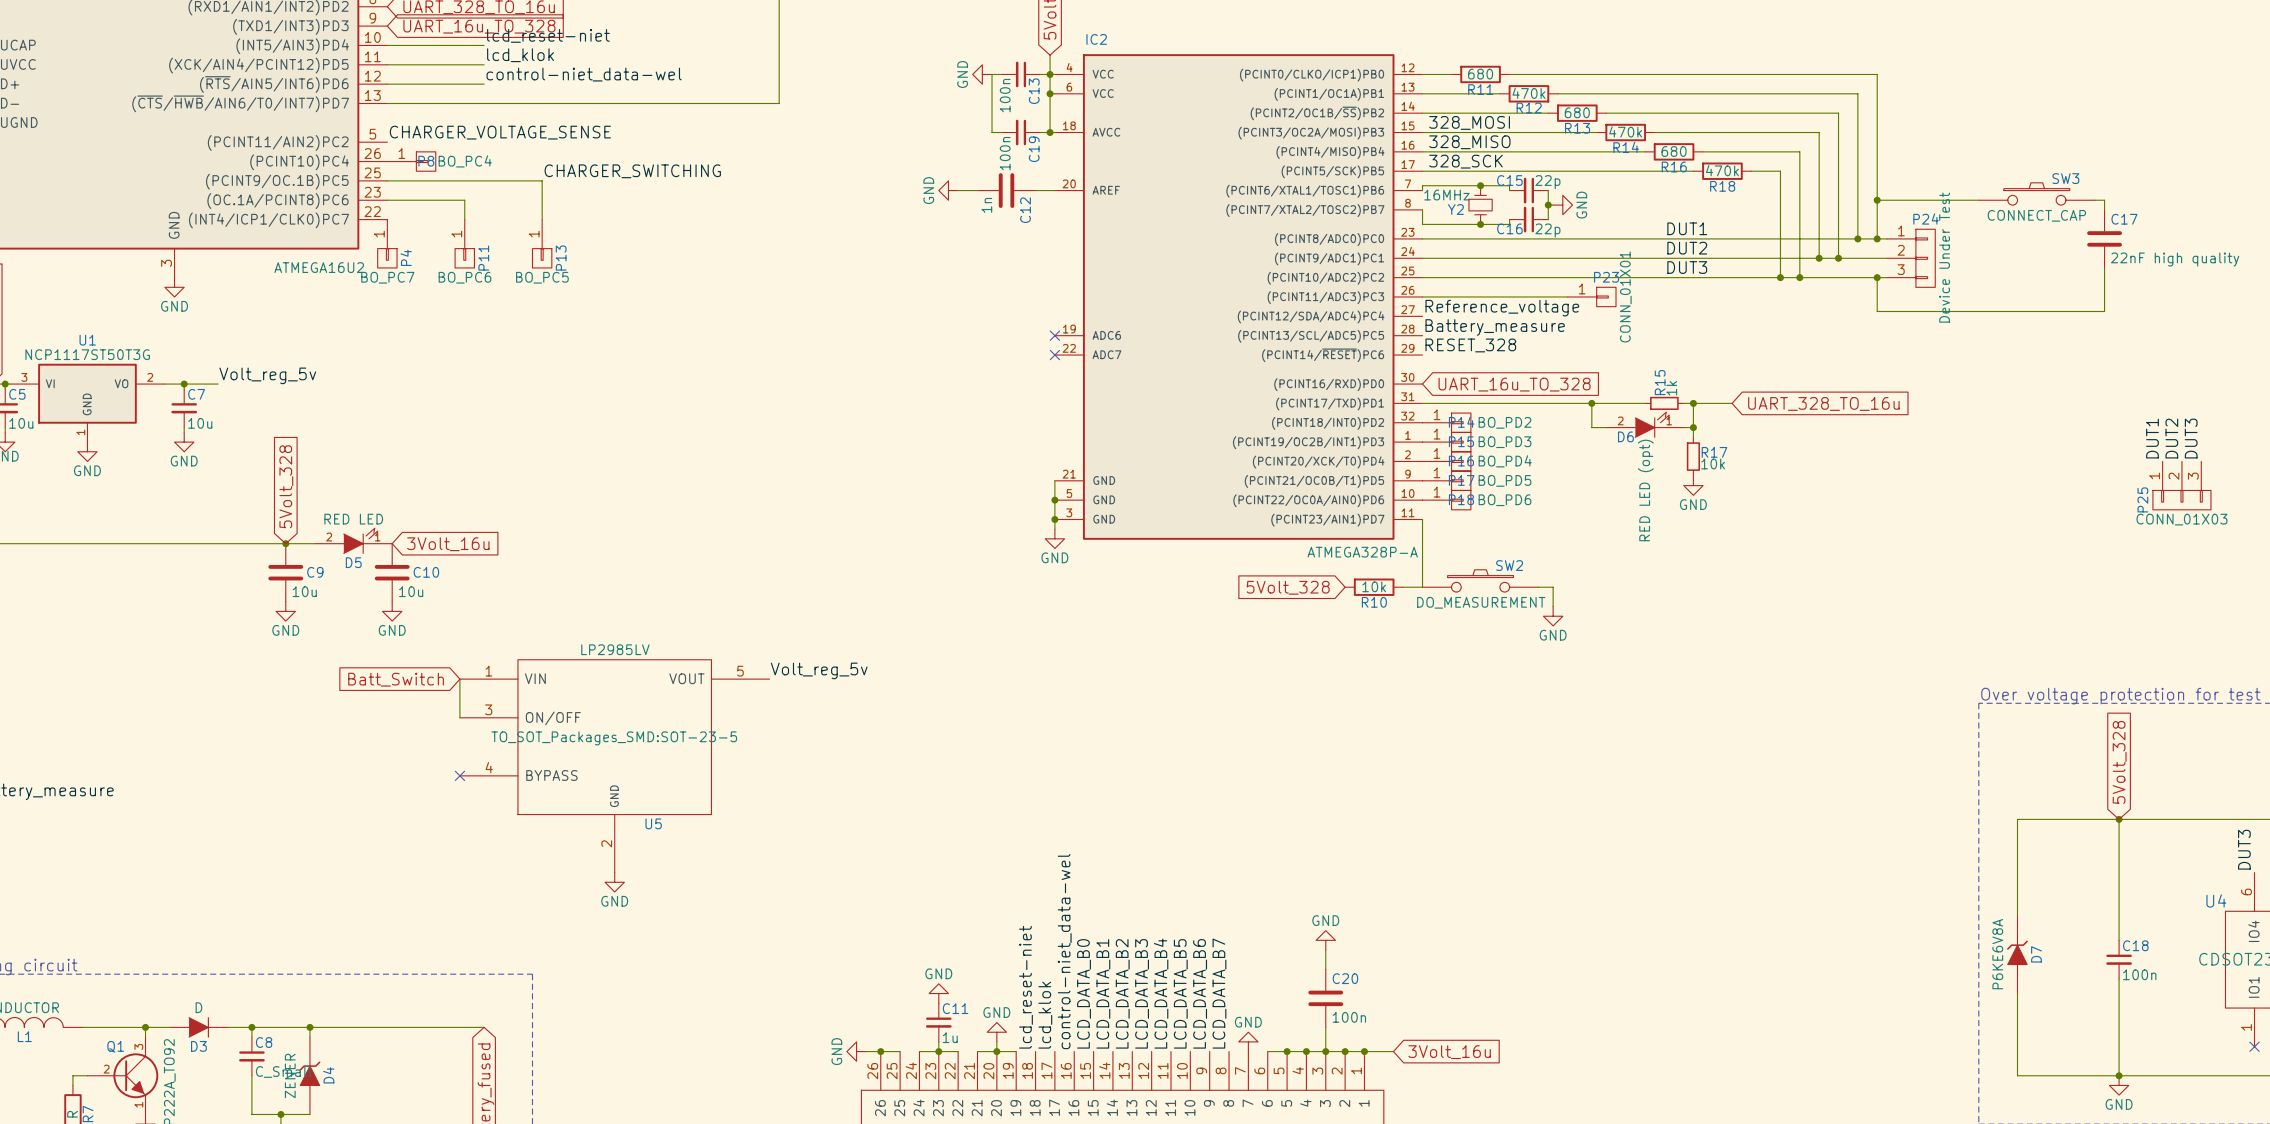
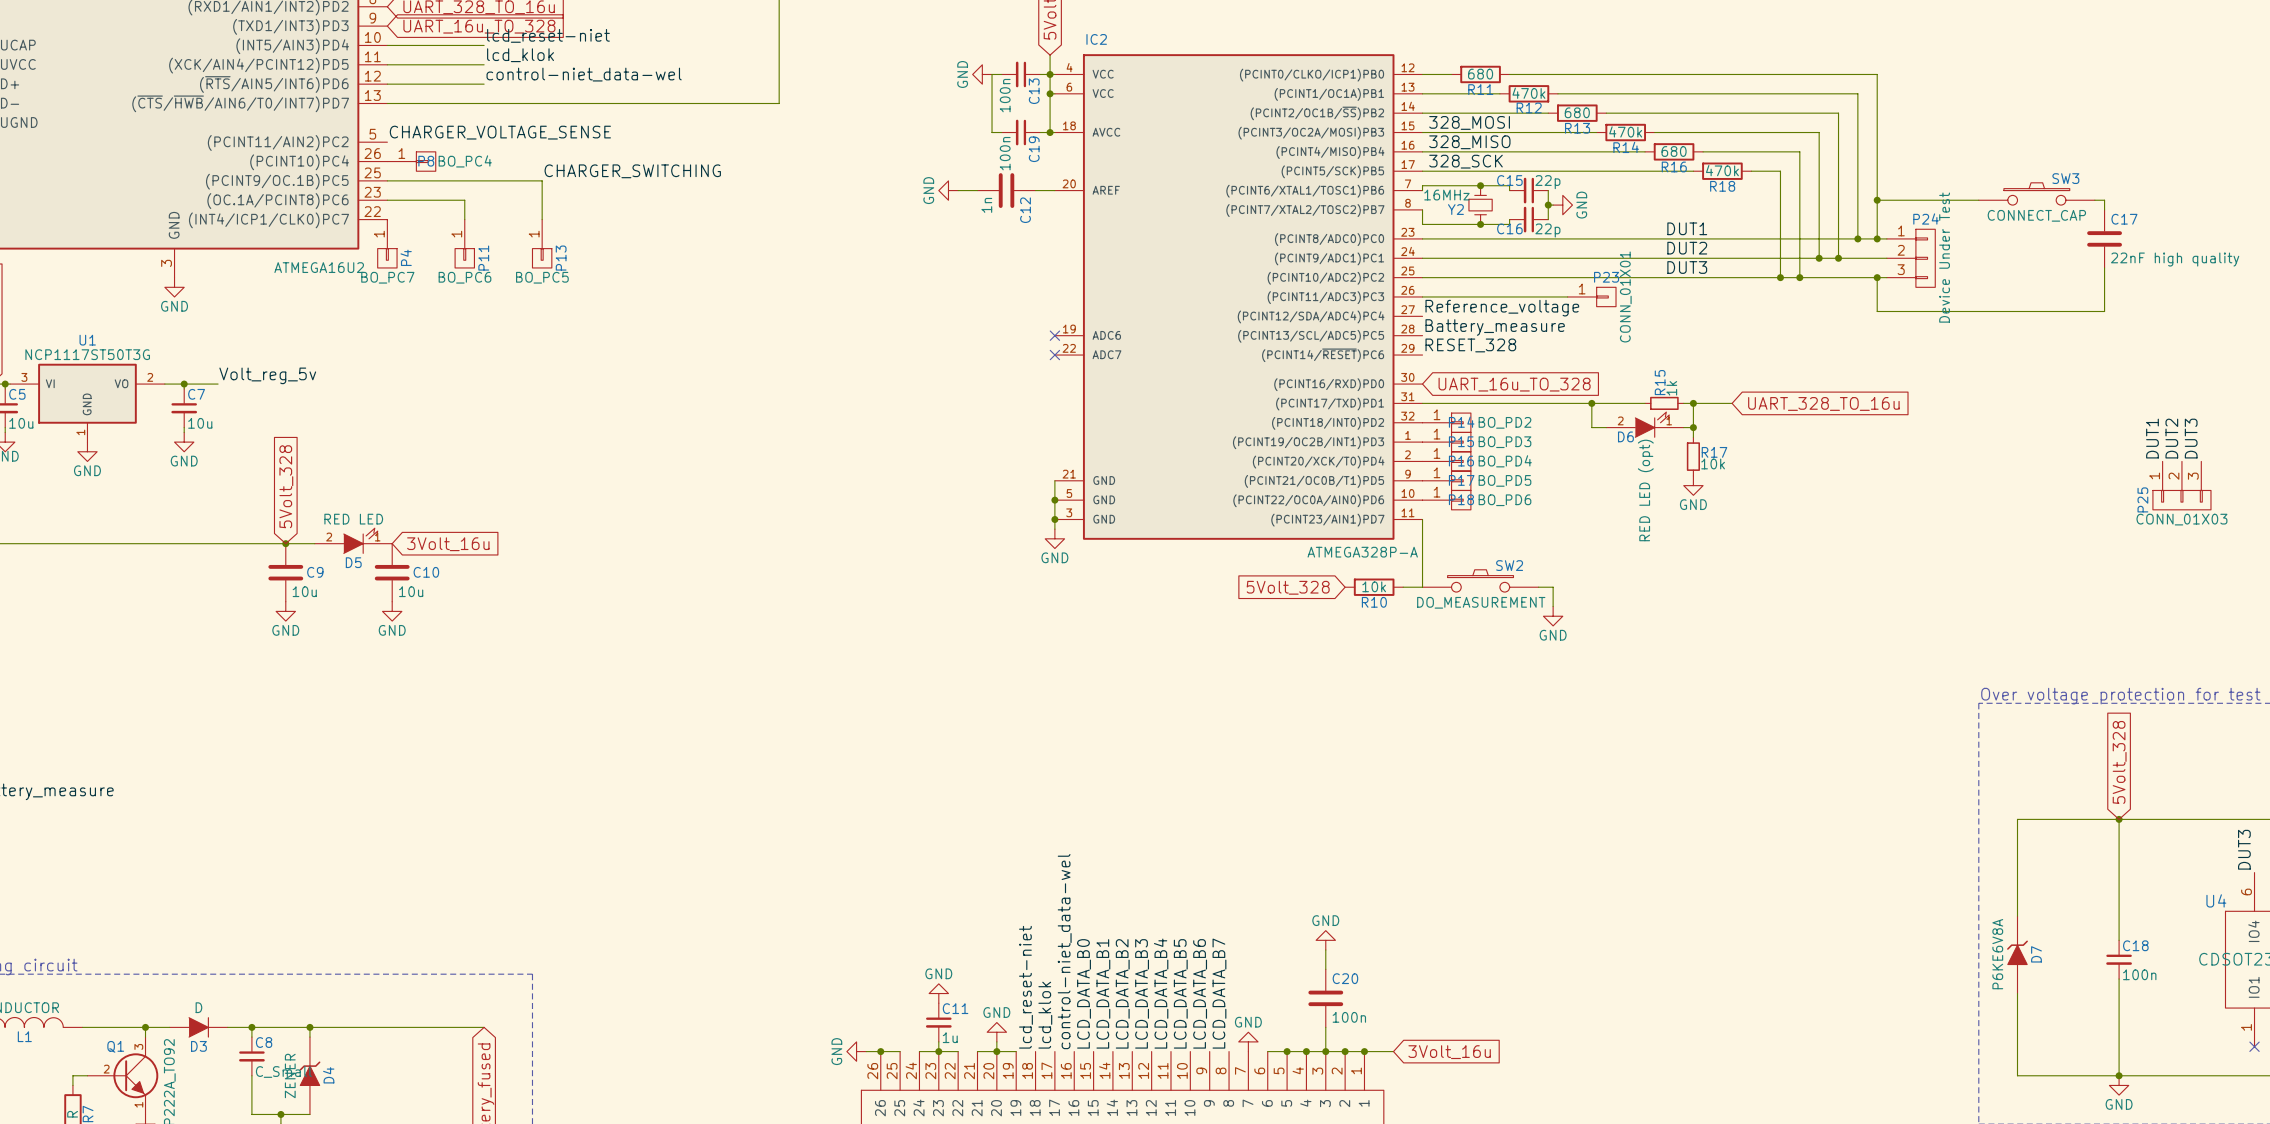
label: Volt_reg_5v (819, 670) -> none
global label: Batt_Switch (396, 679) -> none
wire: (459, 679) (459, 717) -> none
U5: LP2985LV (614, 766) -> none
no-connect mark: (459, 775) -> none
power symbol: GND (614, 882) -> none

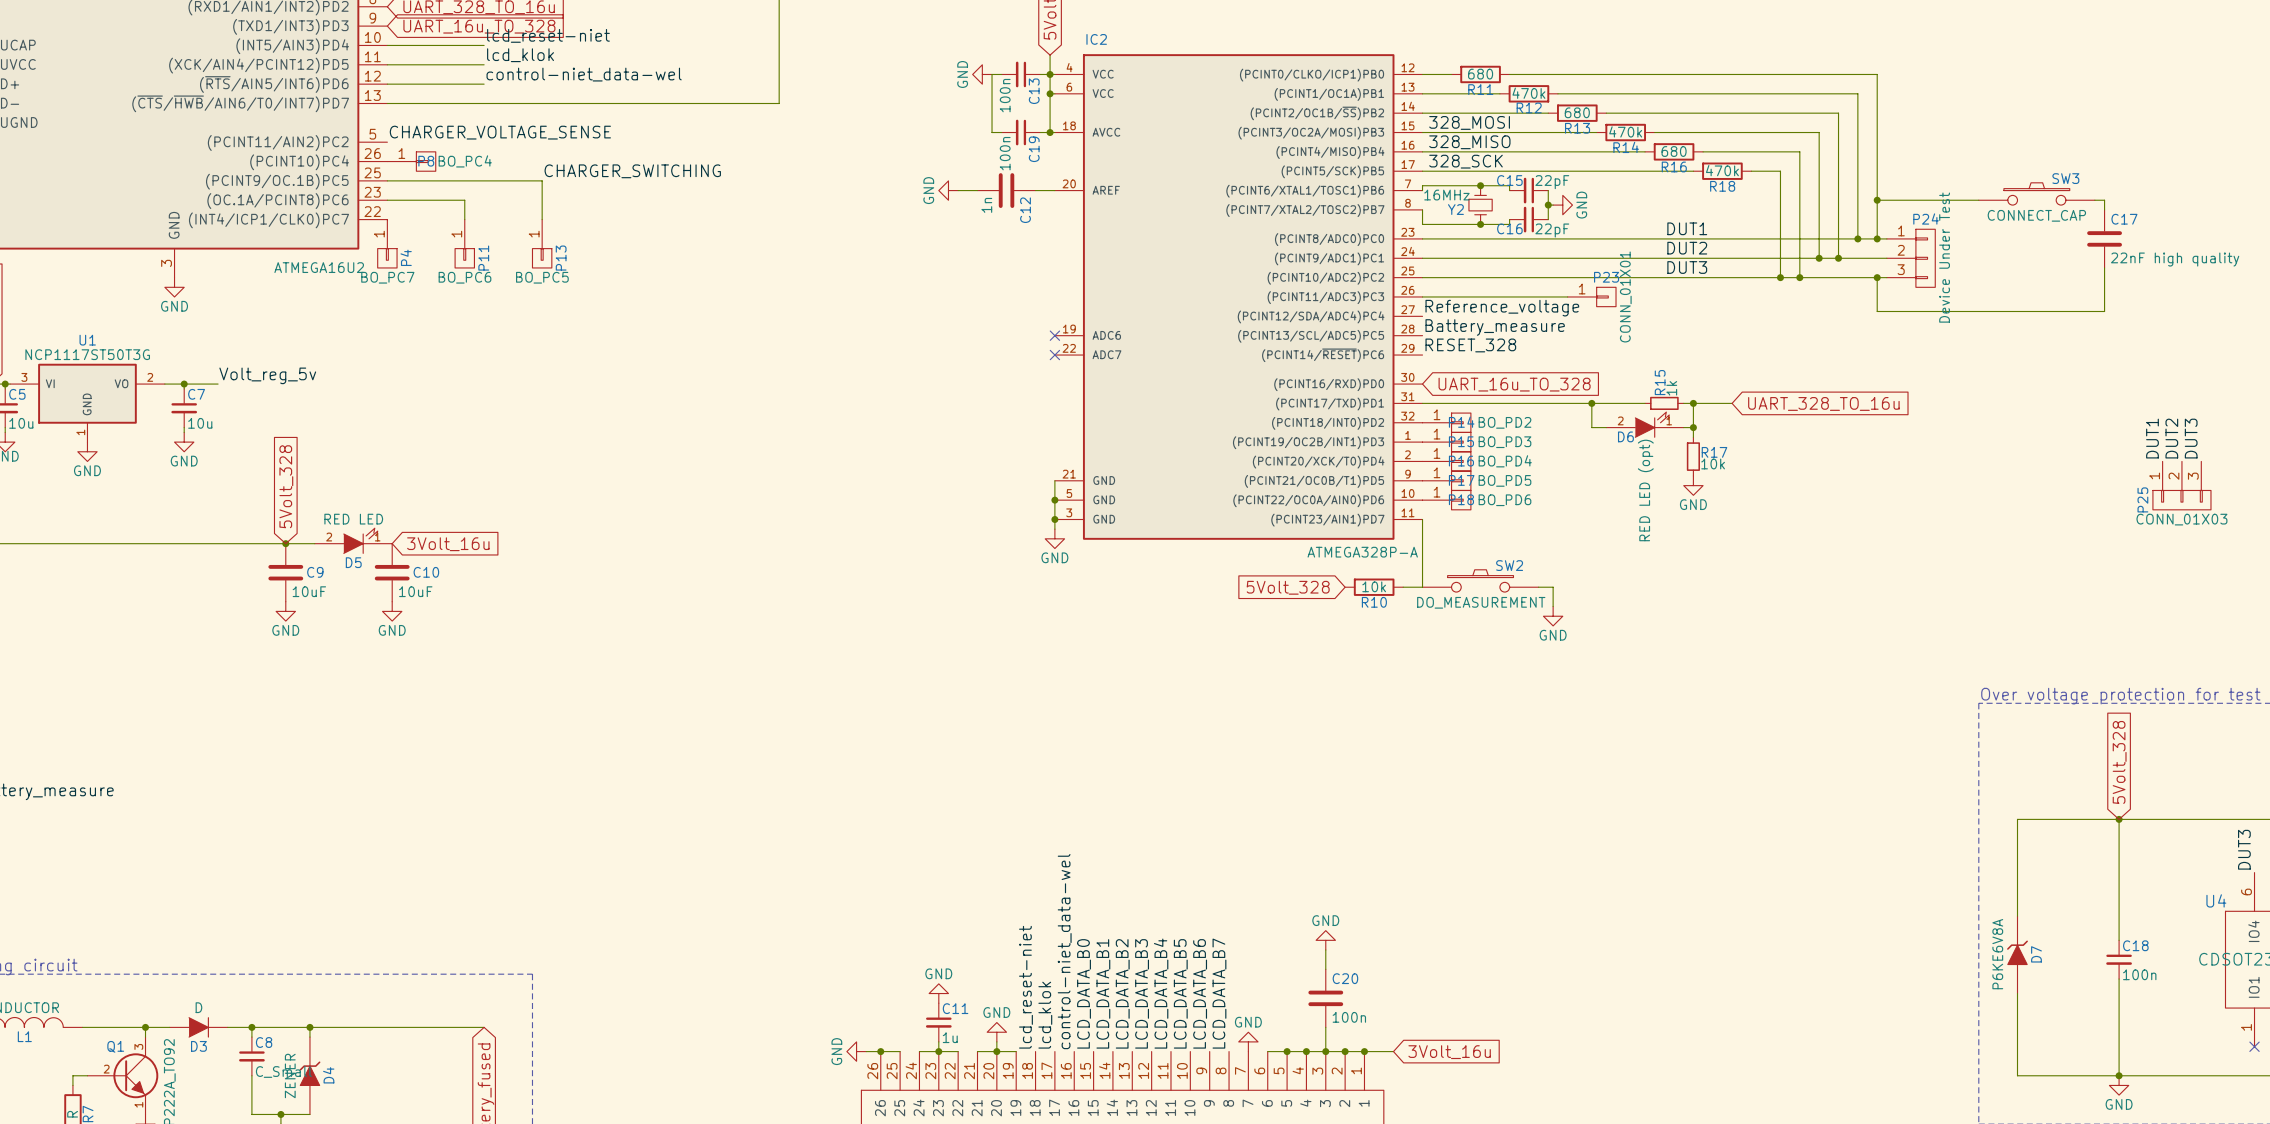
C15 value: 22p (1547, 182) -> 22pF (1552, 182)
C16 value: 22p (1547, 230) -> 22pF (1552, 230)
C9 value: 10u (304, 591) -> 10uF (309, 591)
C10 value: 10u (411, 591) -> 10uF (415, 591)

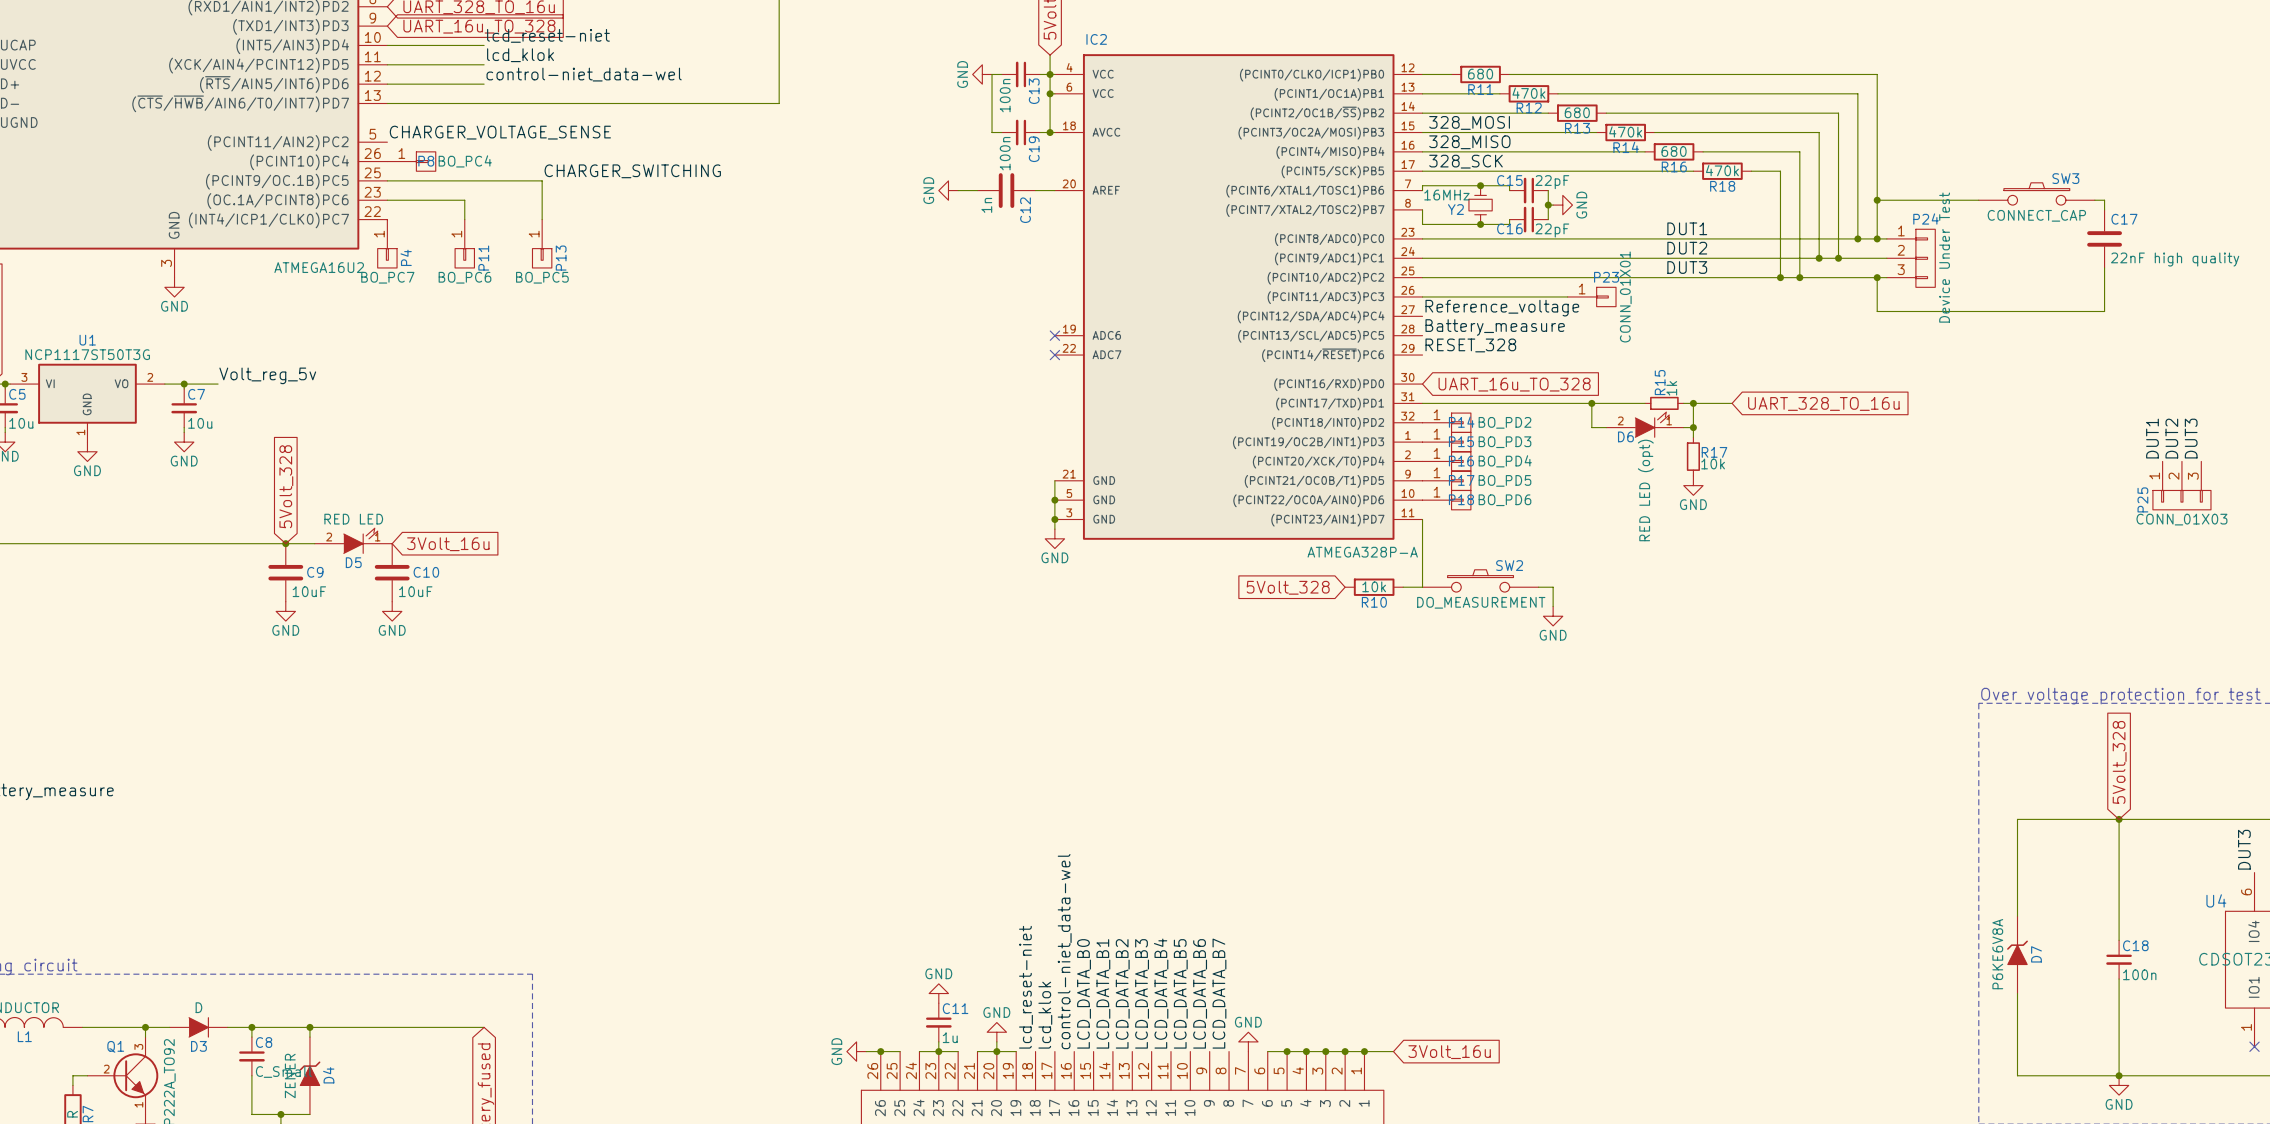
power symbol: GND (1325, 940) -> none
wire: (1325, 950) (1325, 969) -> none
C20: 100n (1325, 998) -> none
wire: (1325, 1027) (1325, 1051) -> none

